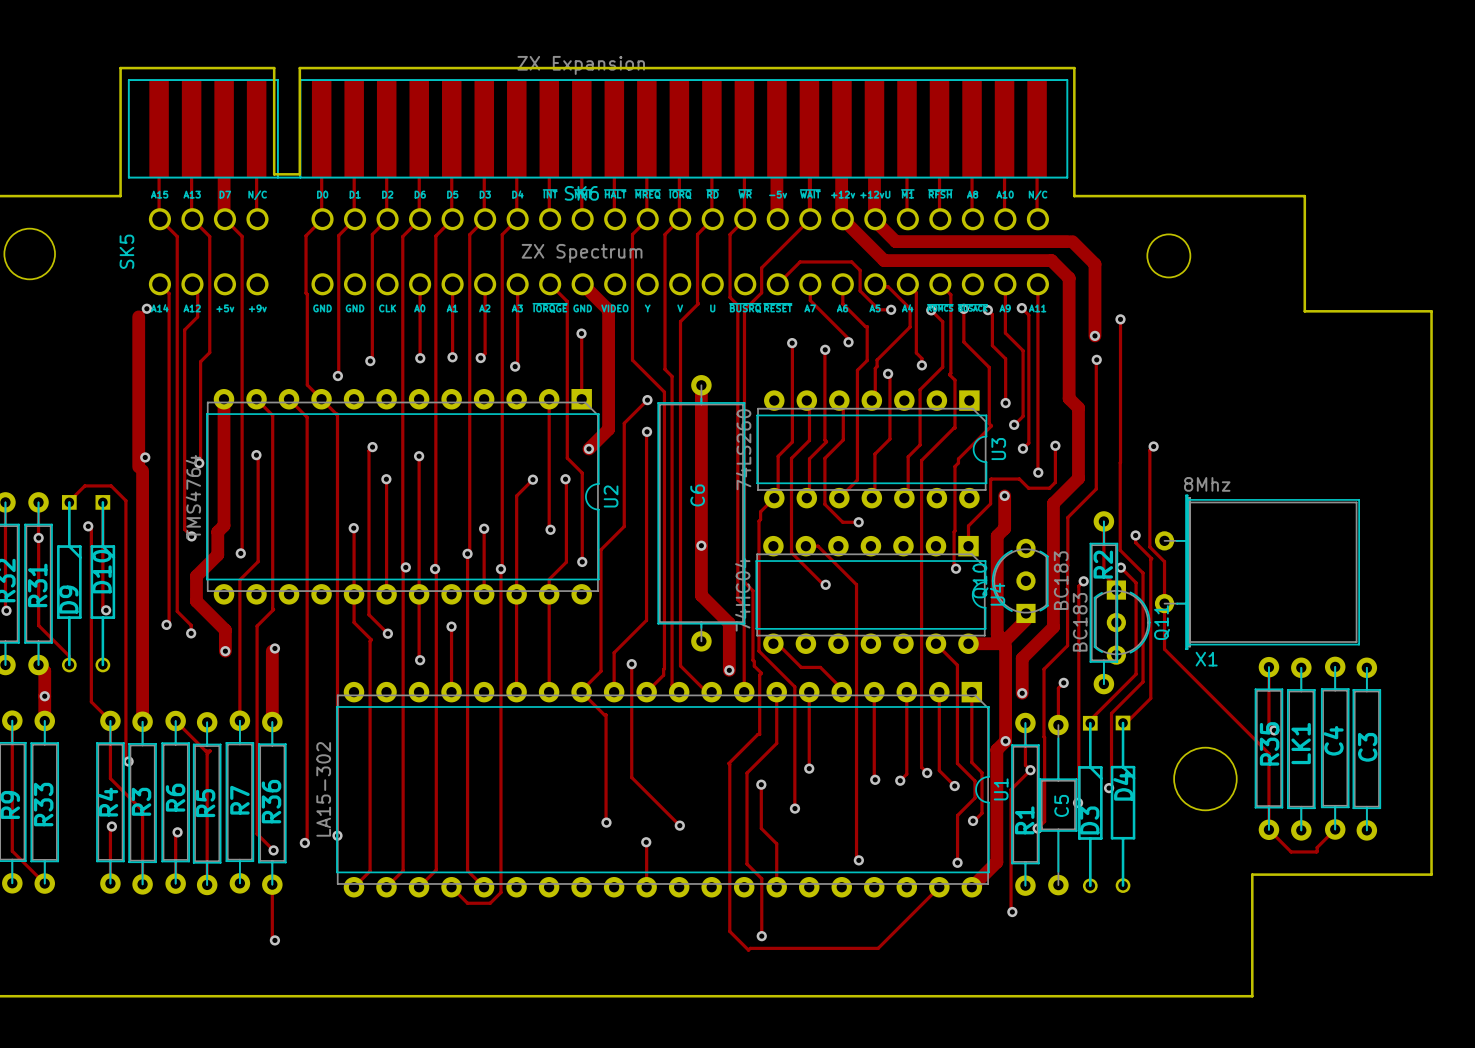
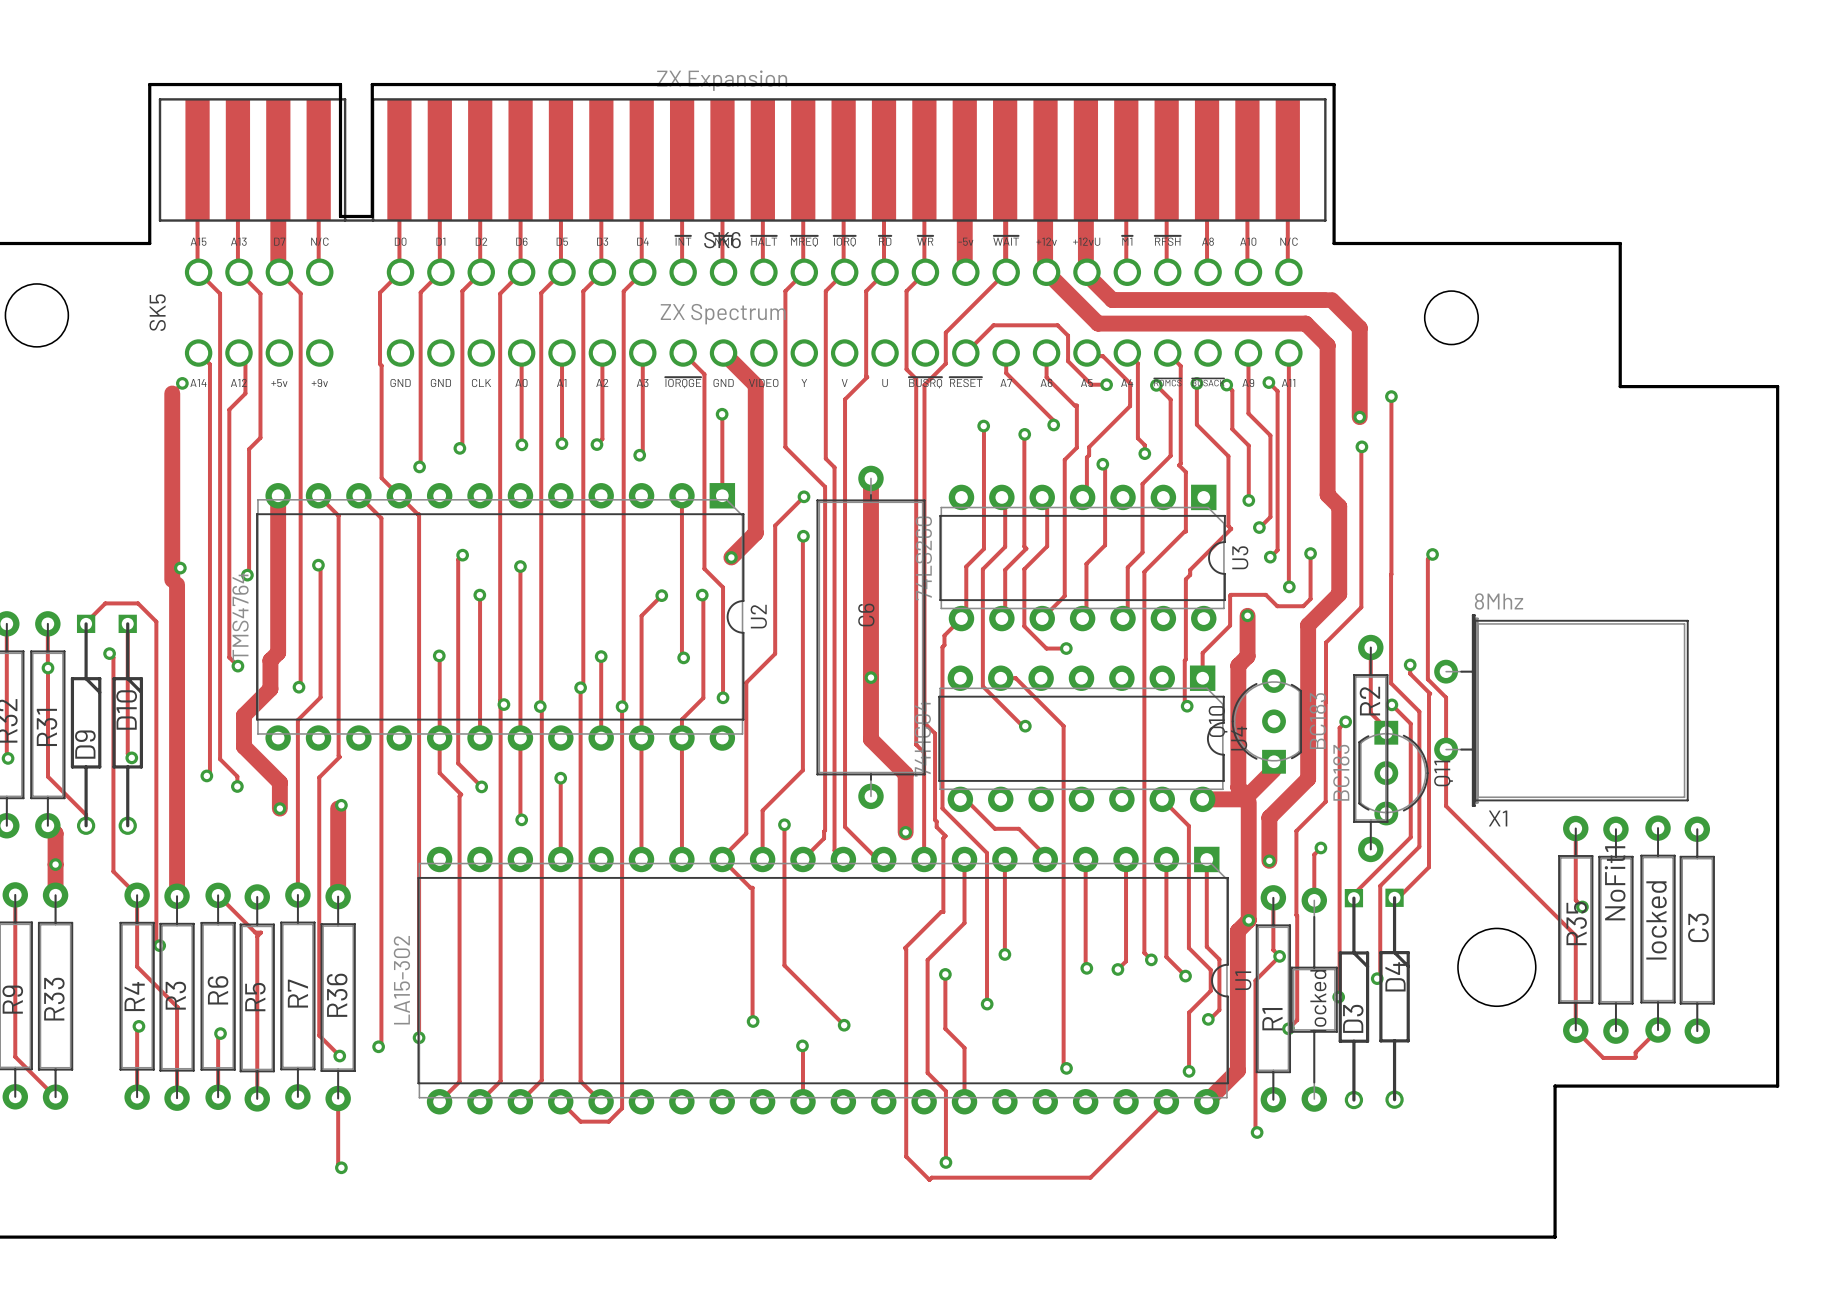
C4 name: C4 (1333, 740) -> locked (1656, 920)
LK1 name: LK1 (1301, 743) -> NoFit1 (1615, 883)
C5 name: C5 (1061, 805) -> locked (1318, 1000)

